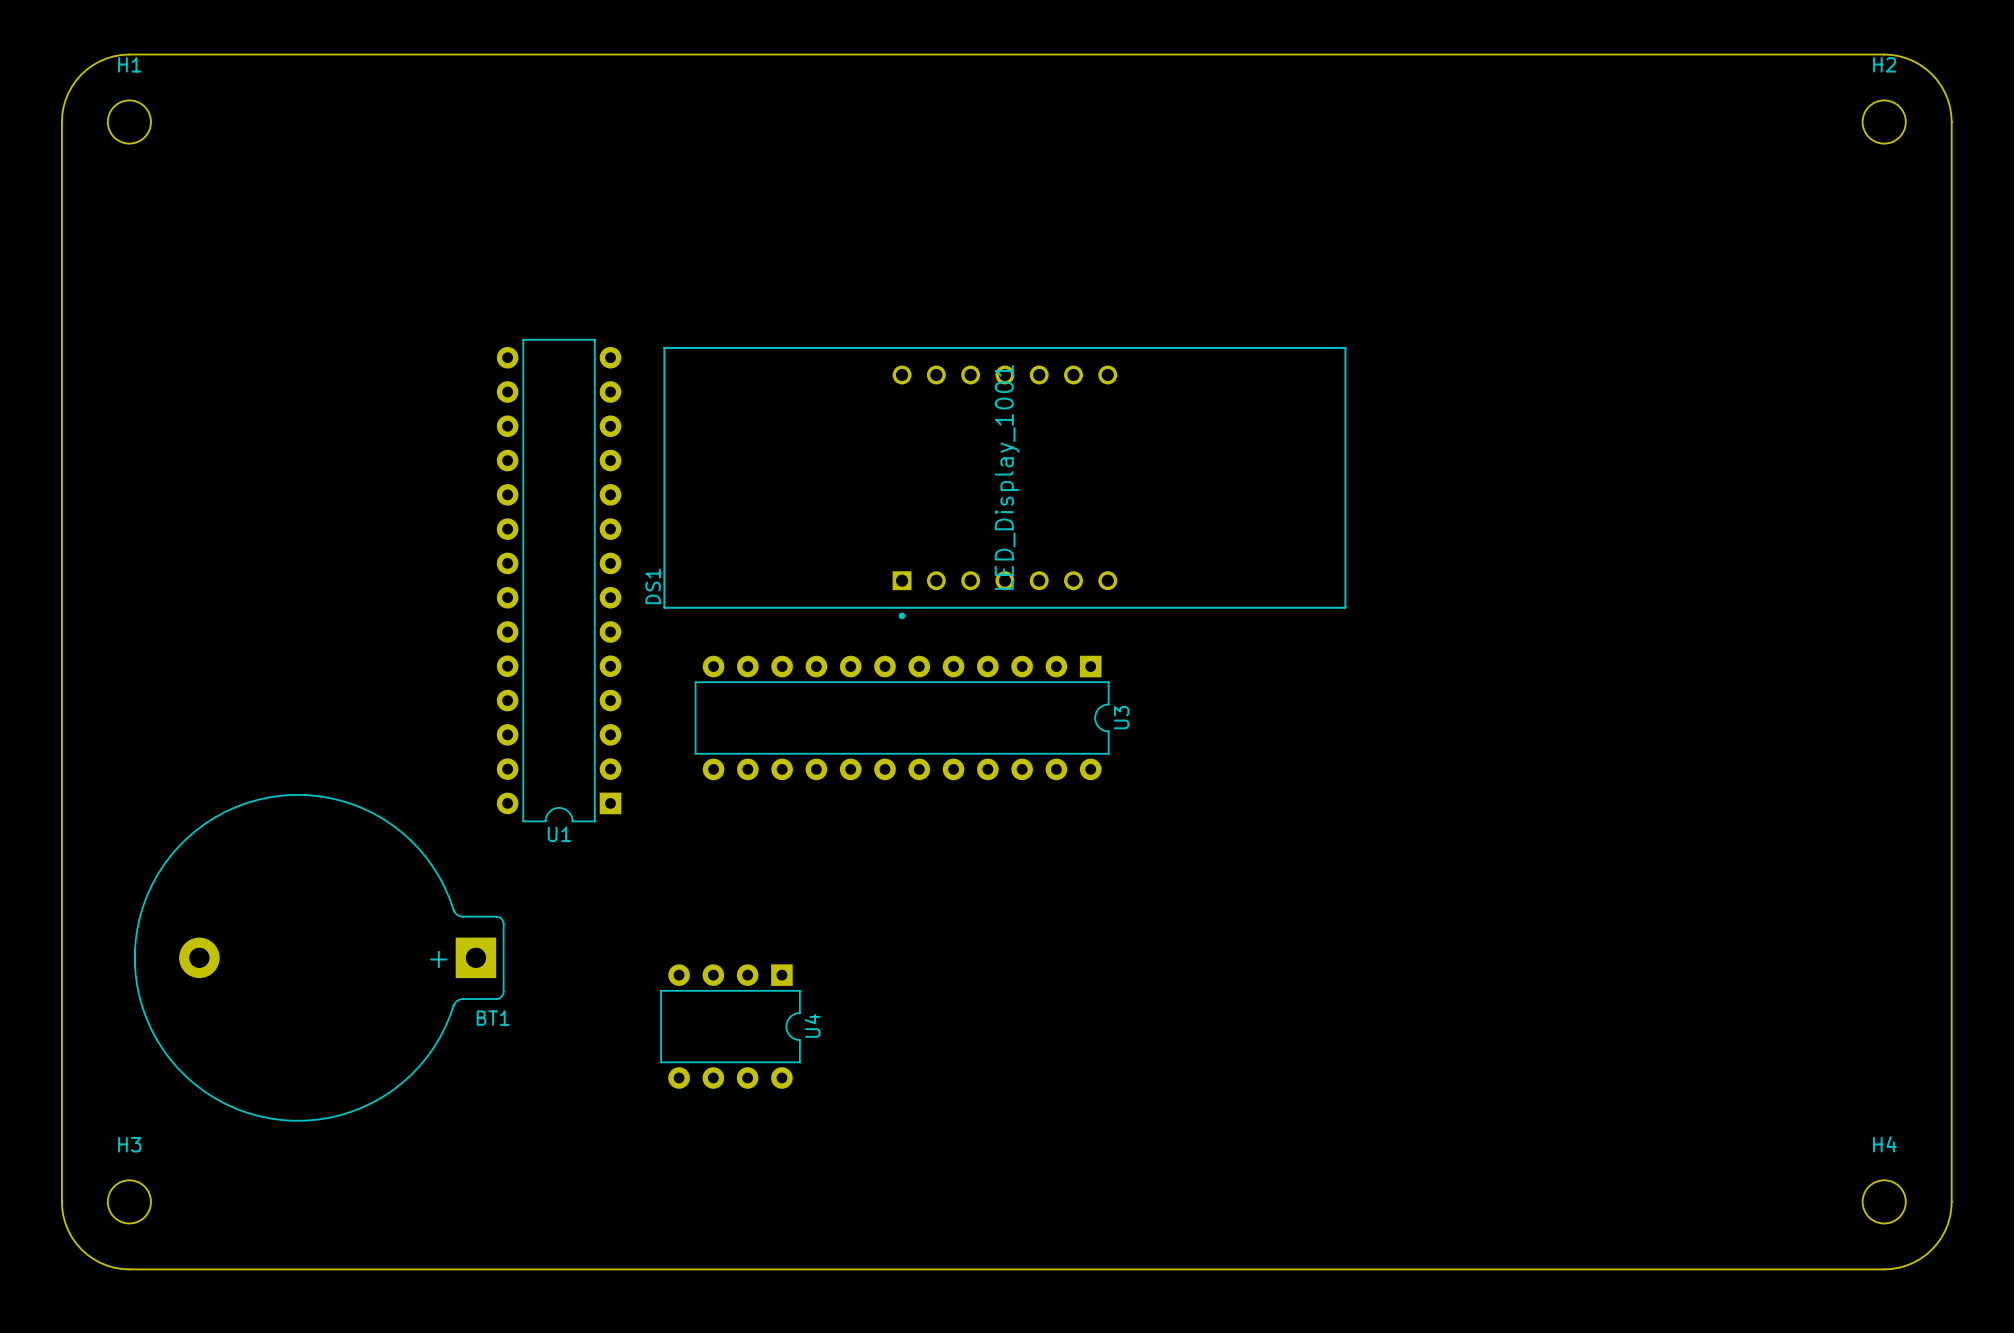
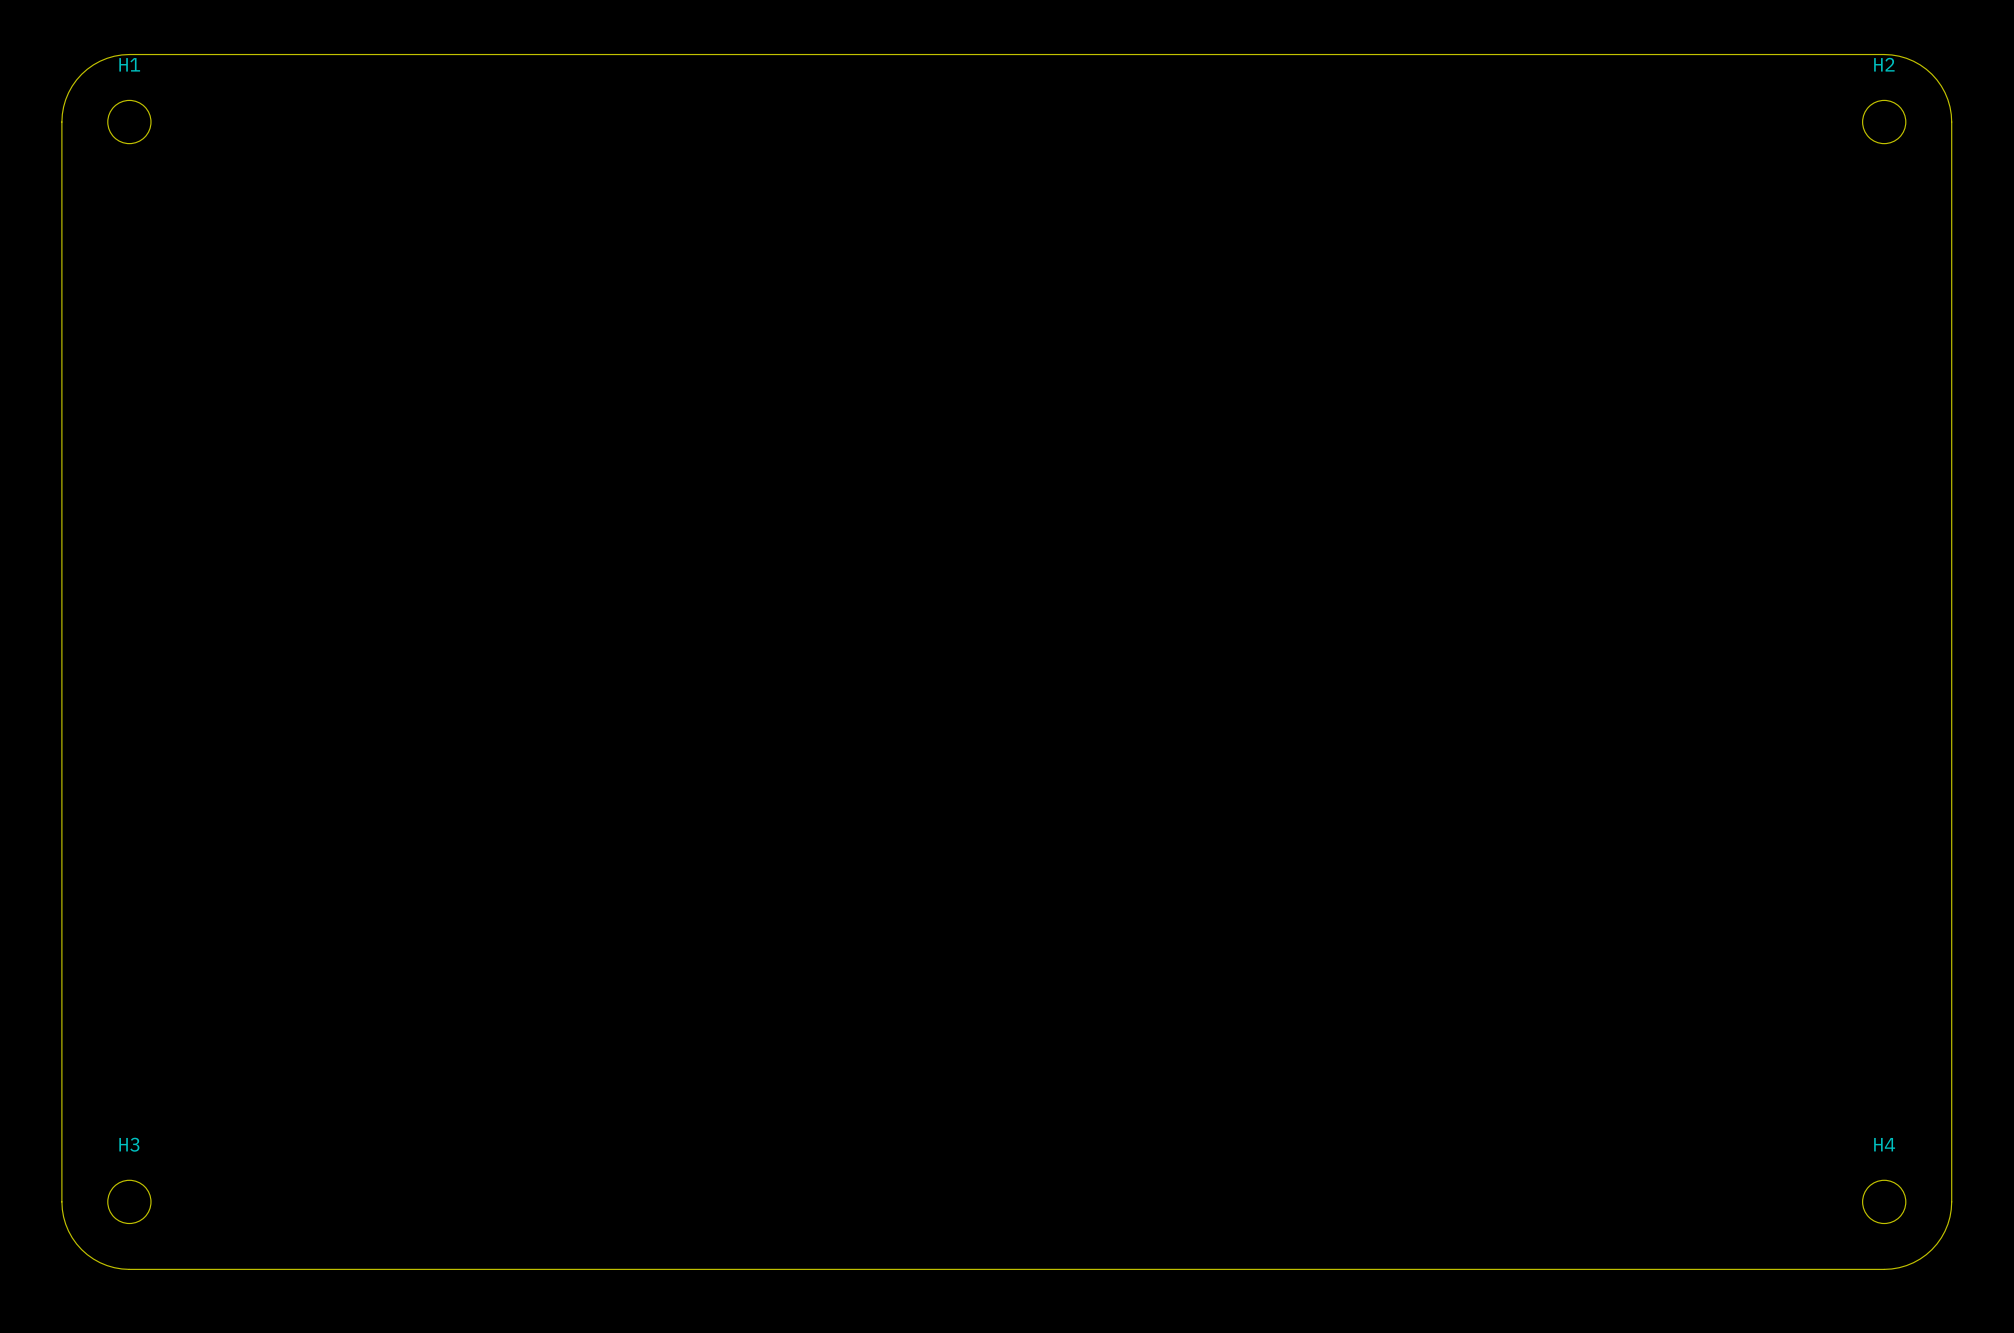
DS1: LED_Display_1001 (1004, 483) -> none
U1: (559, 580) -> none
U3: (902, 717) -> none
BT1: (319, 957) -> none
U4: (730, 1026) -> none

